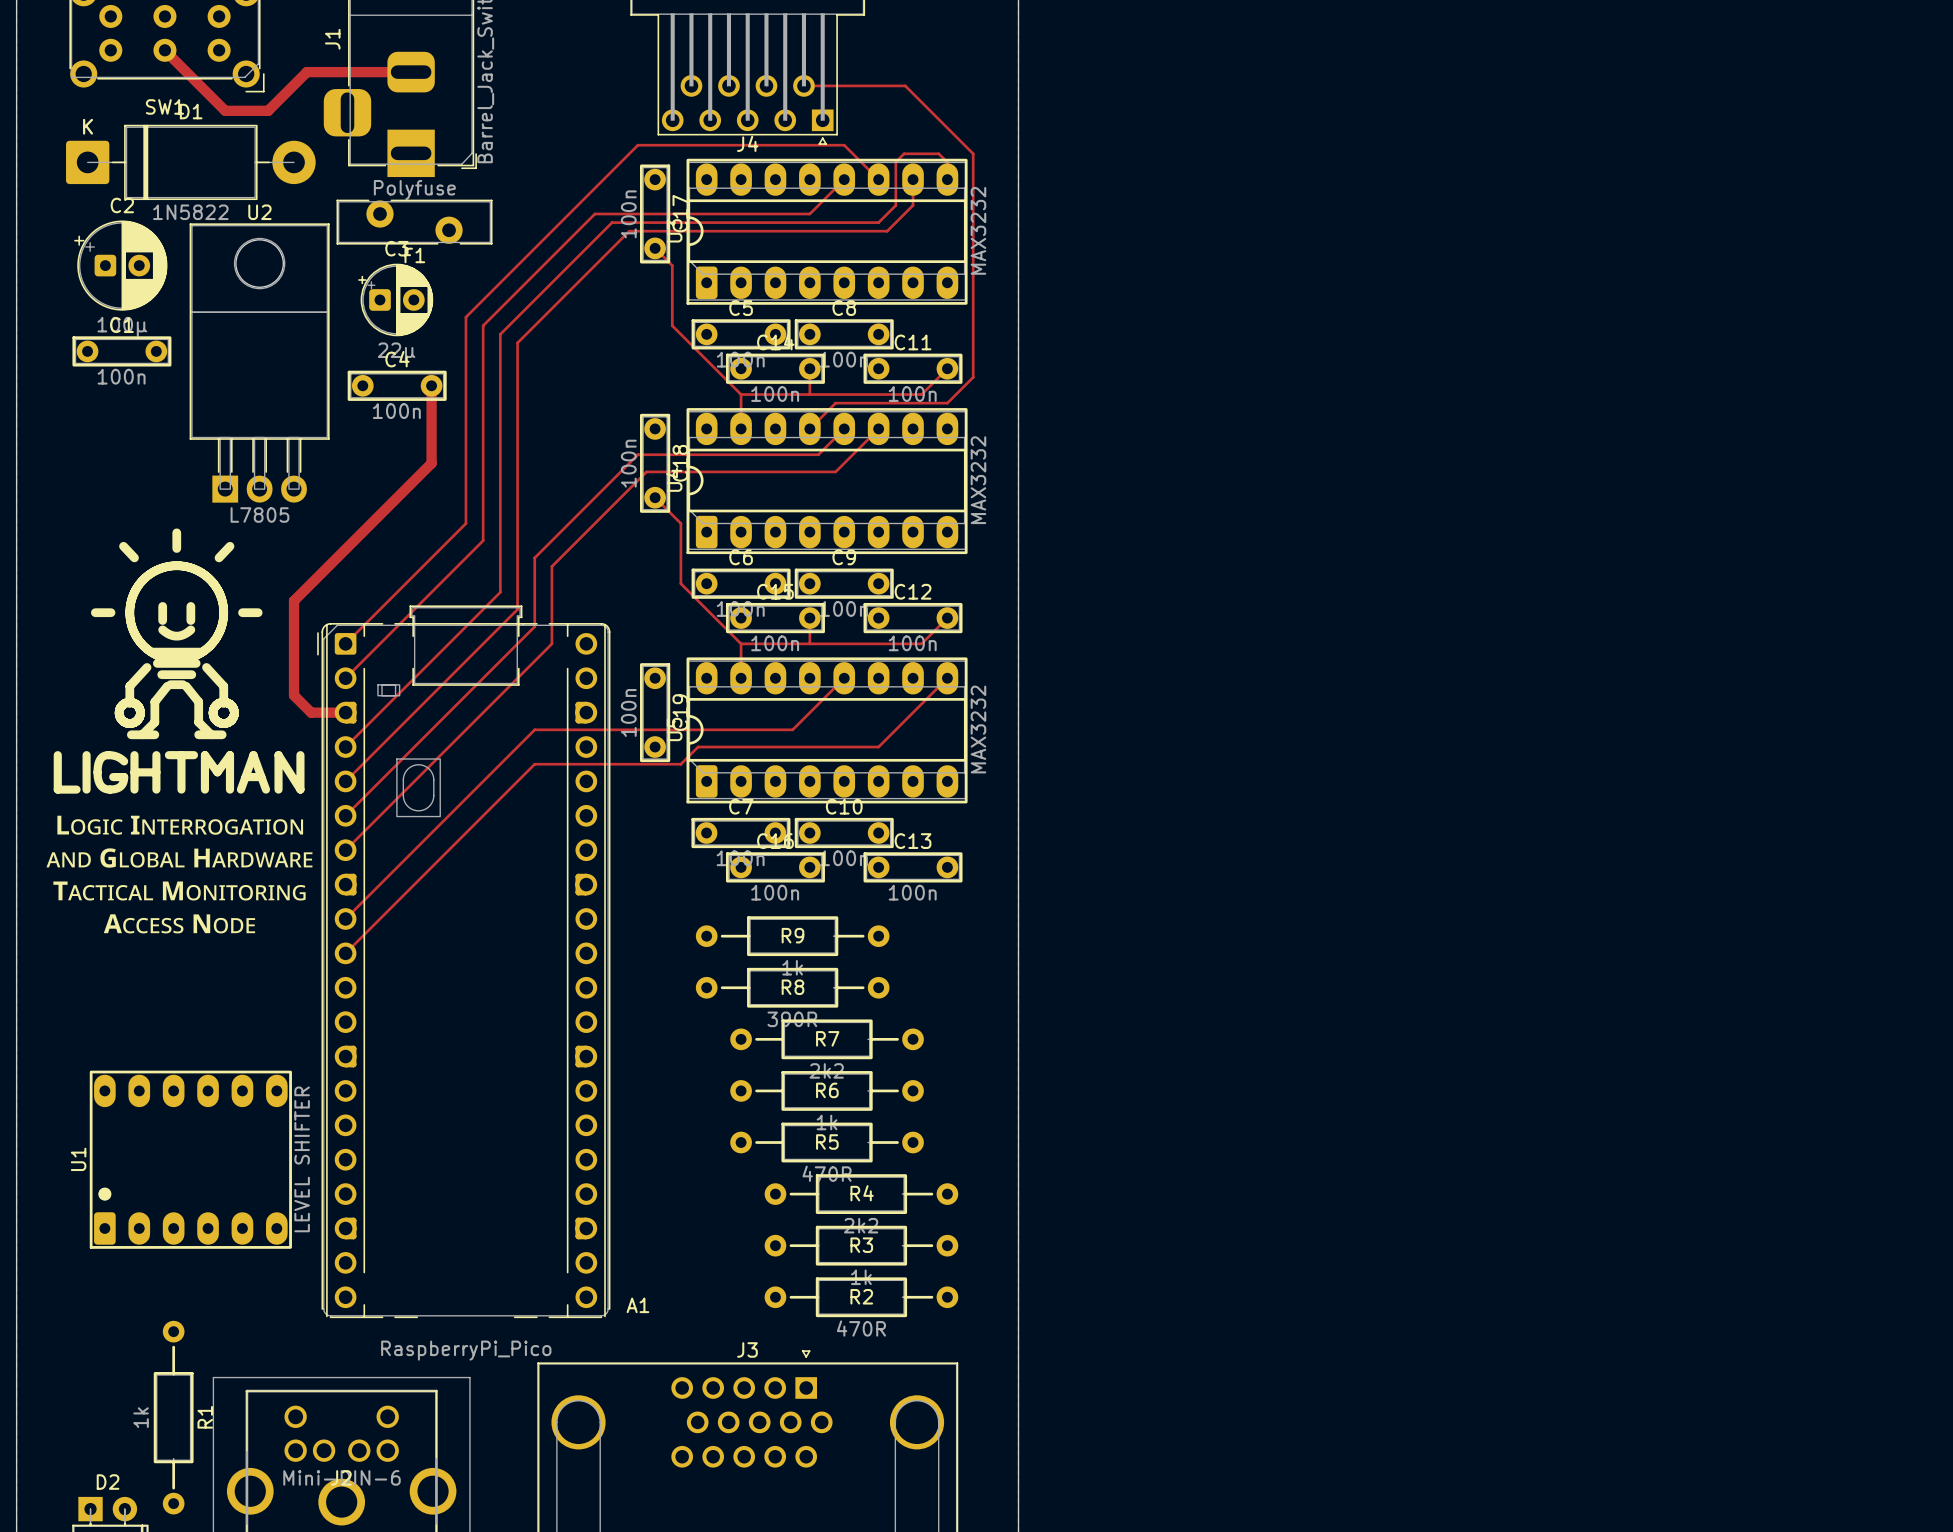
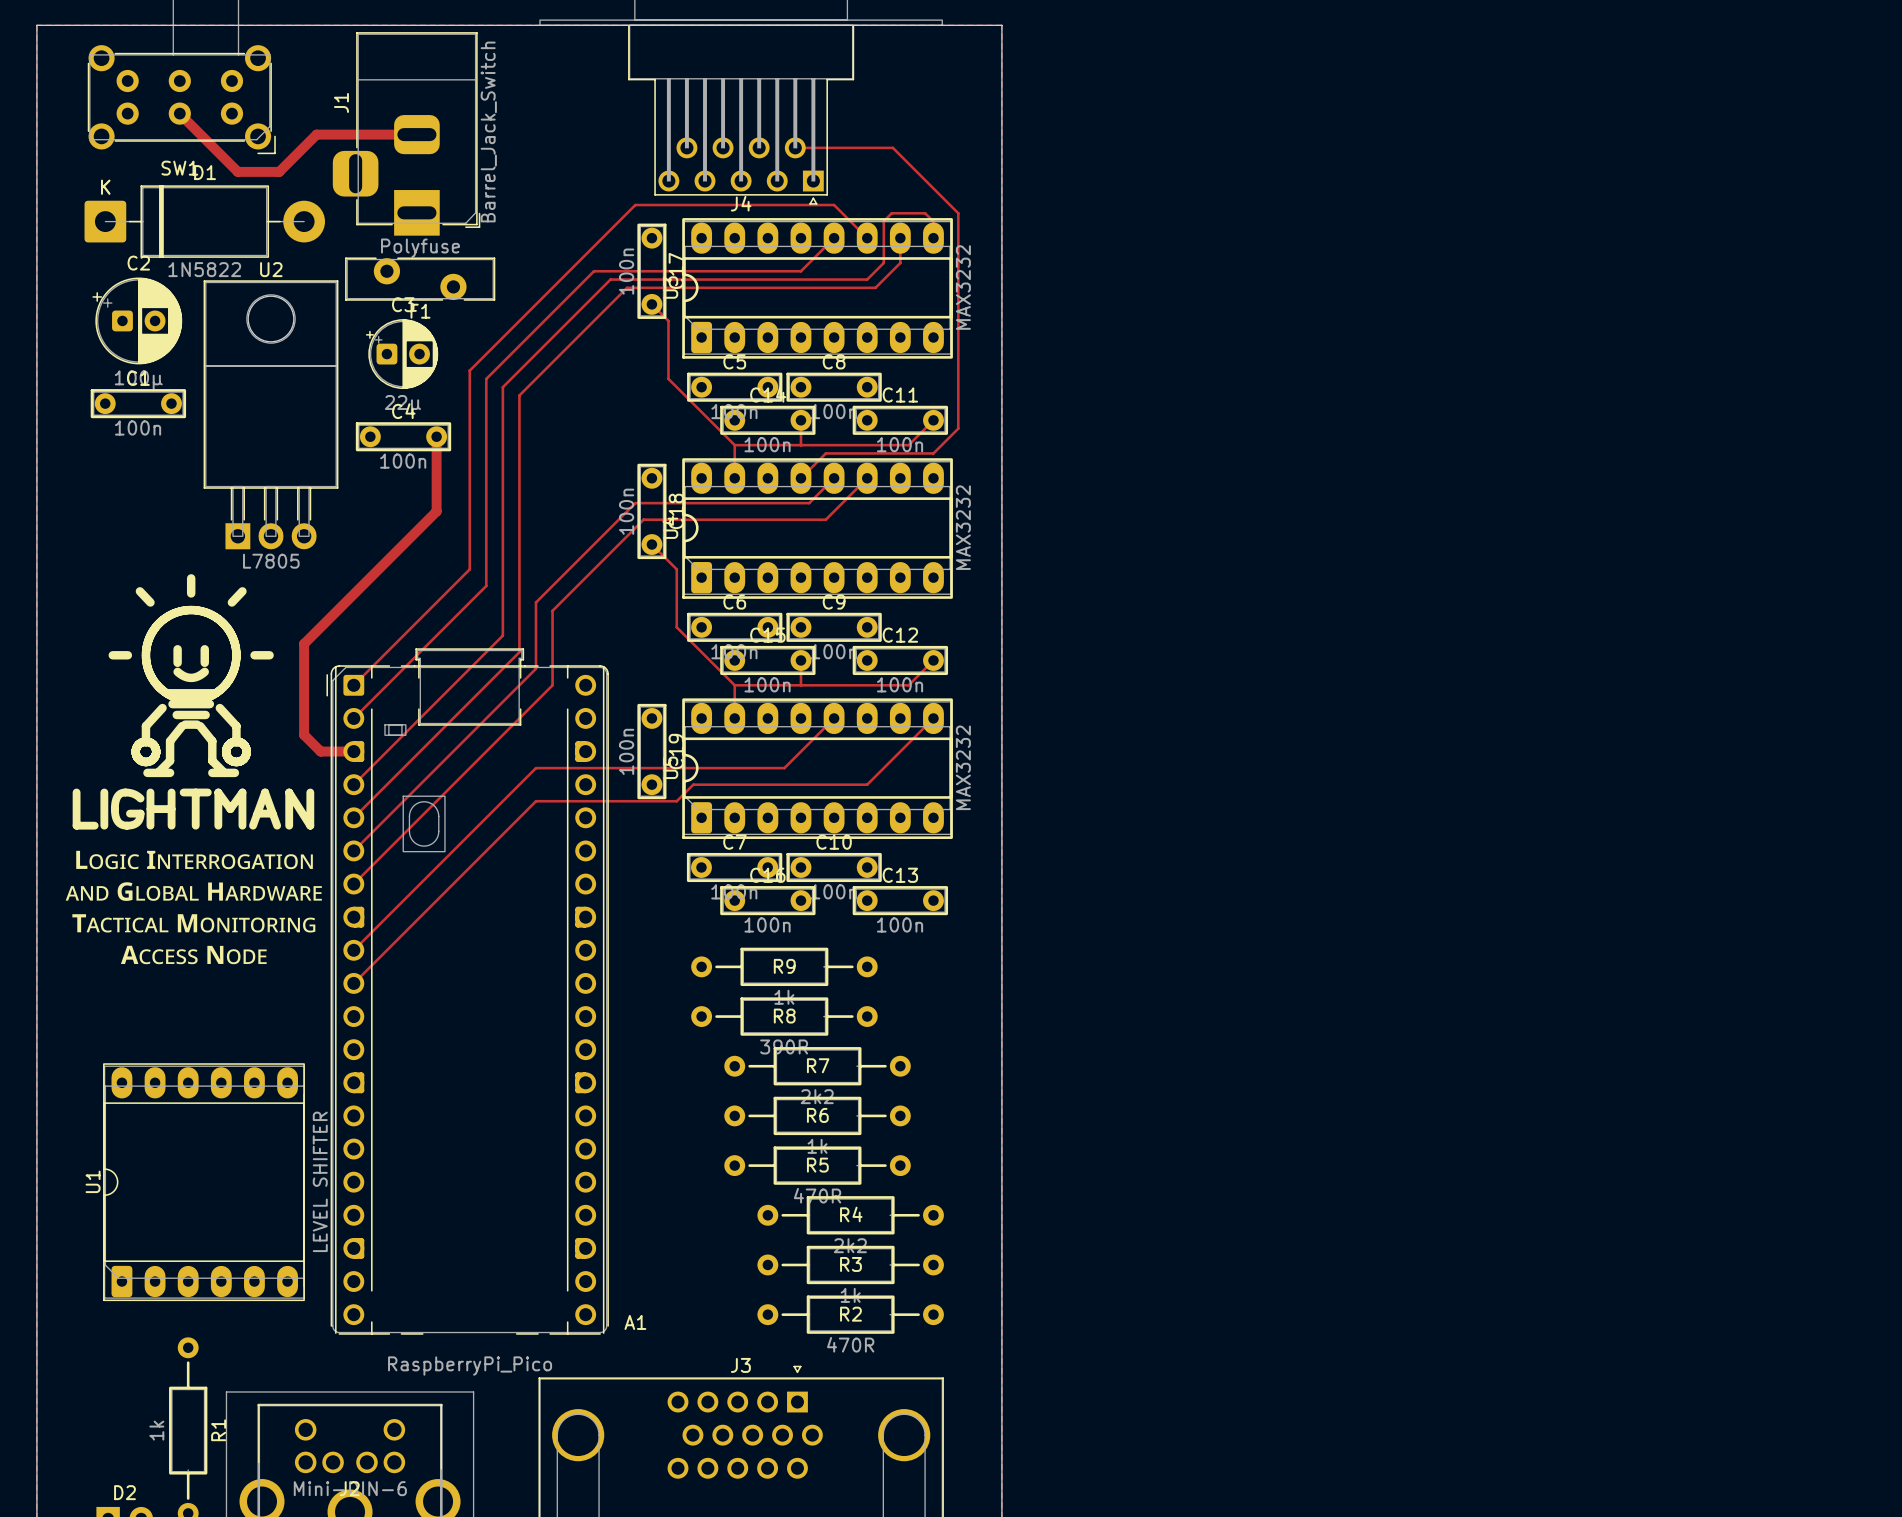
U1 footprint: [89, 1070, 292, 1249] -> [103, 1063, 305, 1302]

